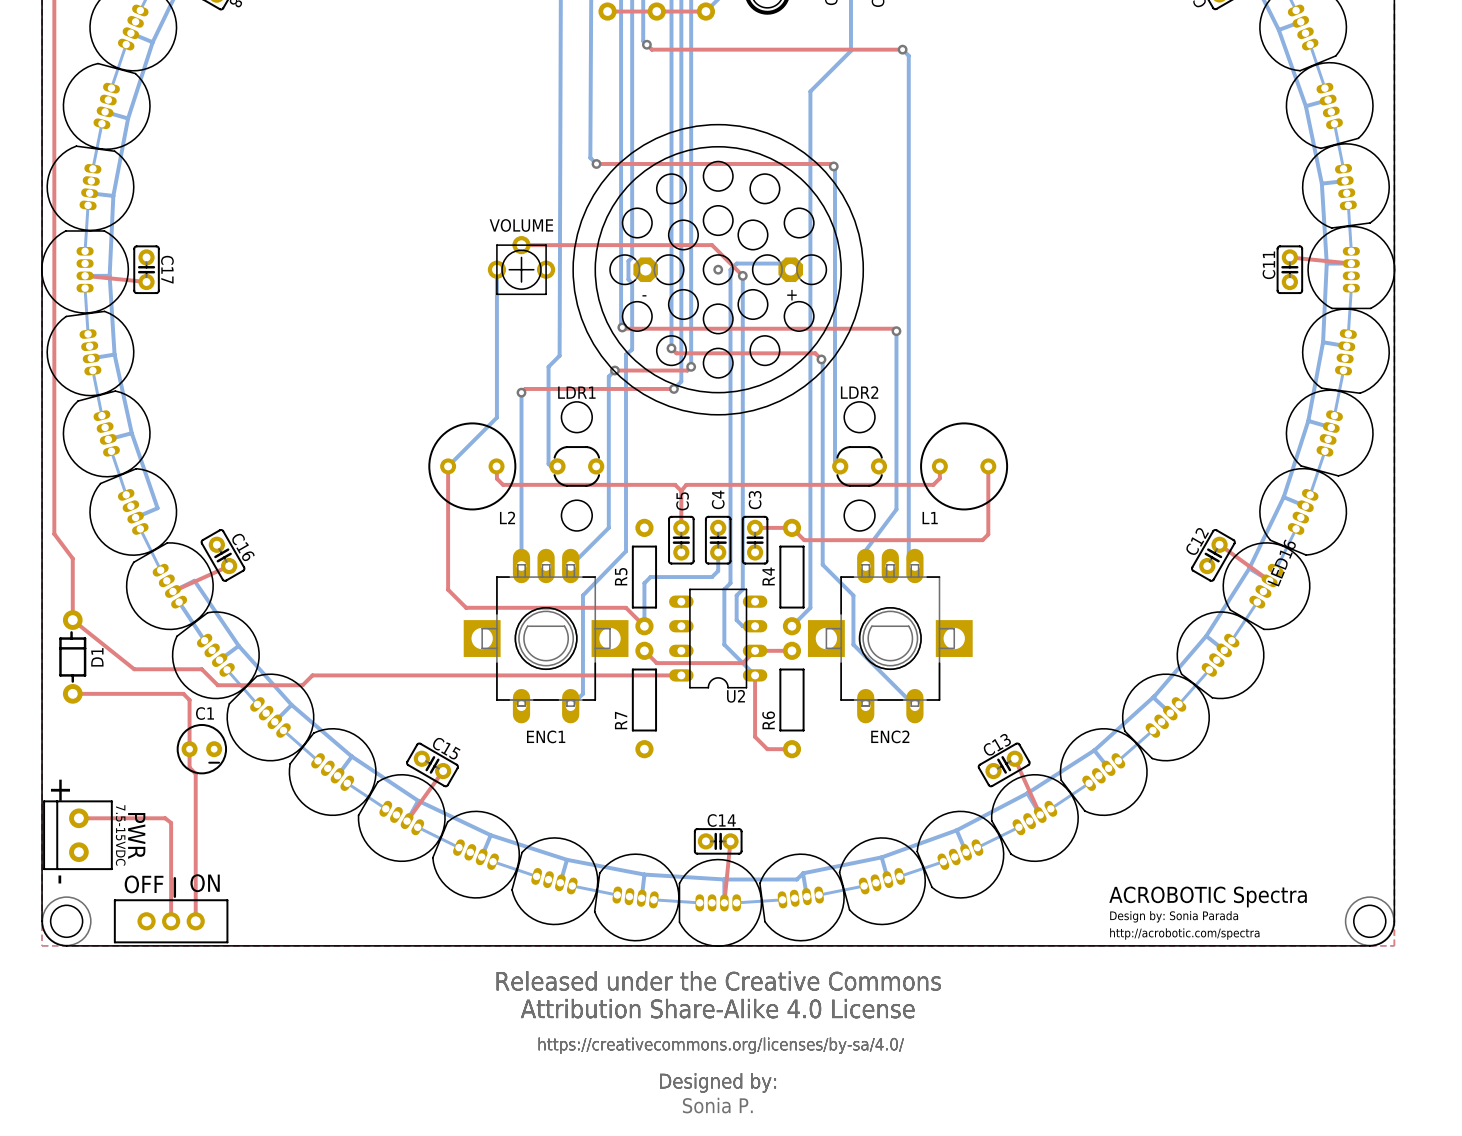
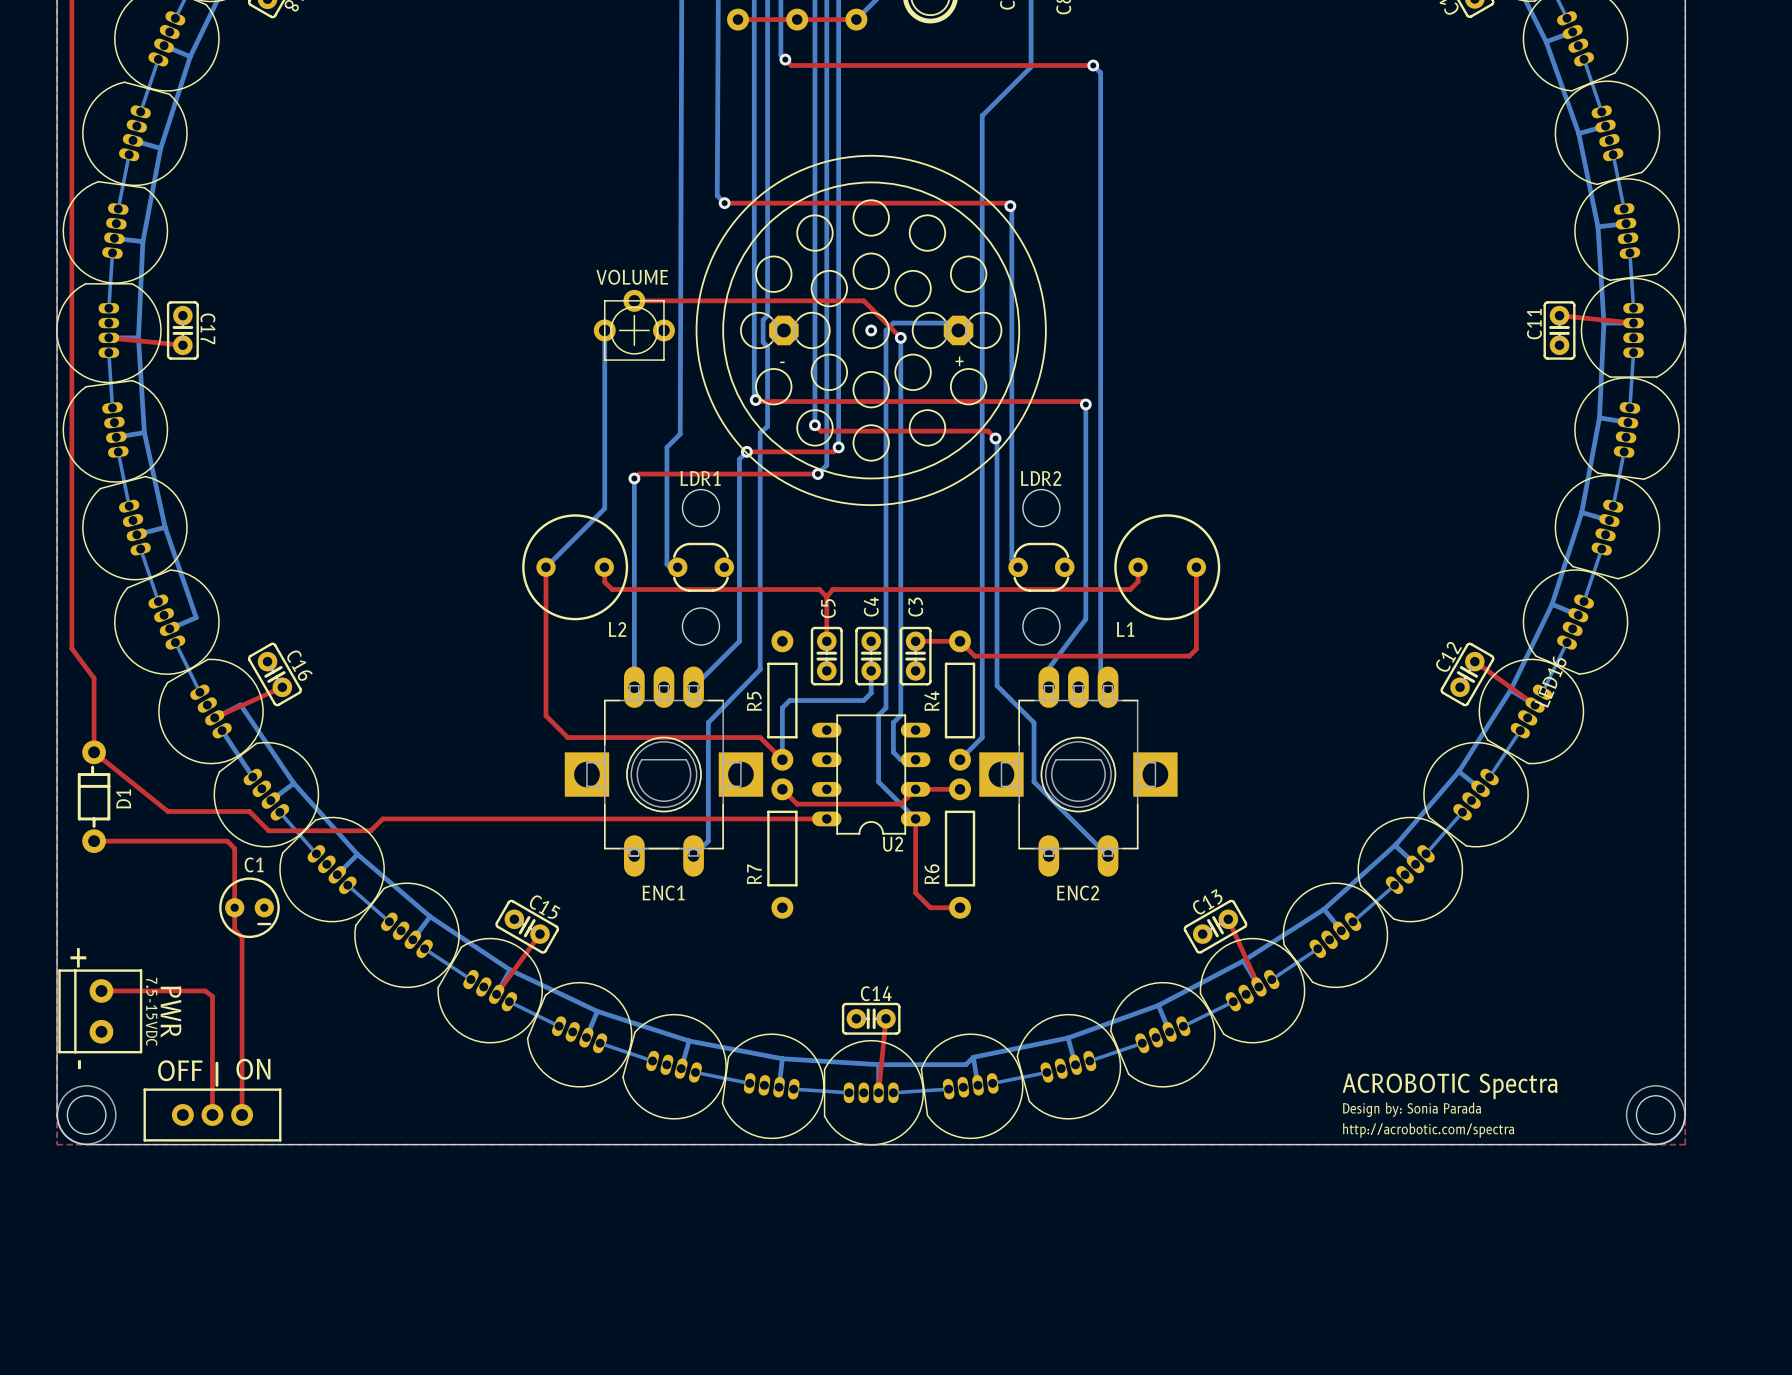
drawing: [496, 971, 941, 1093] -> none
text: Sonia P. (717, 1105) -> none

